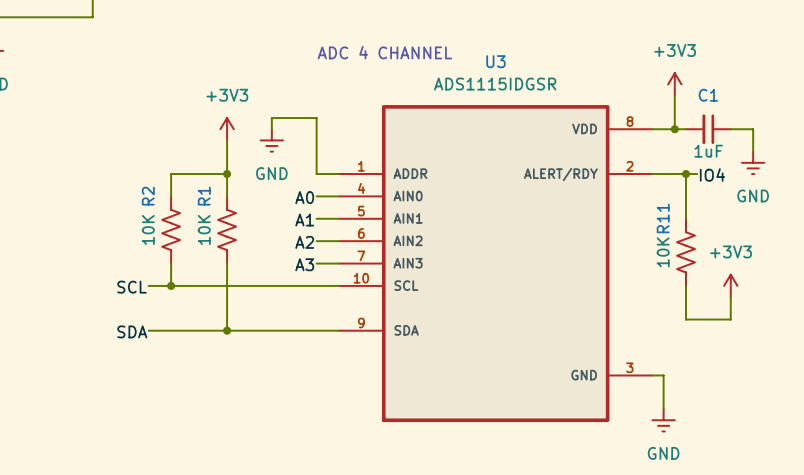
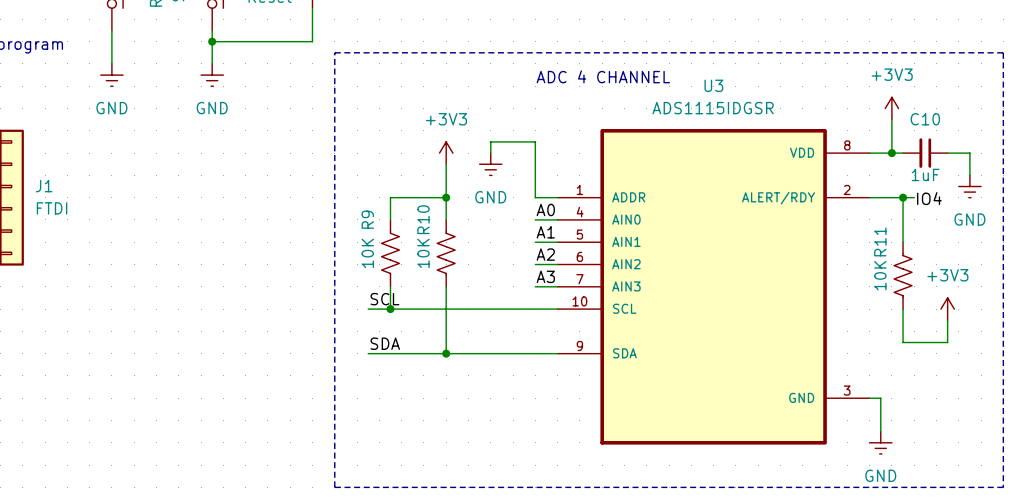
line: none -> (334, 52) (1003, 52) (1003, 487) (334, 487) (334, 52)
C1 name: C1 (708, 95) -> C10 (925, 119)
R2 name: R2 (148, 196) -> R9 (367, 219)
R1 name: R1 (204, 196) -> R10 (423, 219)
label position: A0 (304, 197) -> A0 (545, 210)
label position: A1 (304, 219) -> A1 (545, 232)
label position: A2 (304, 242) -> A2 (545, 254)
label position: A3 (304, 264) -> A3 (545, 276)
label position: SCL (132, 287) -> SCL (384, 299)
label position: SDA (132, 331) -> SDA (385, 343)

